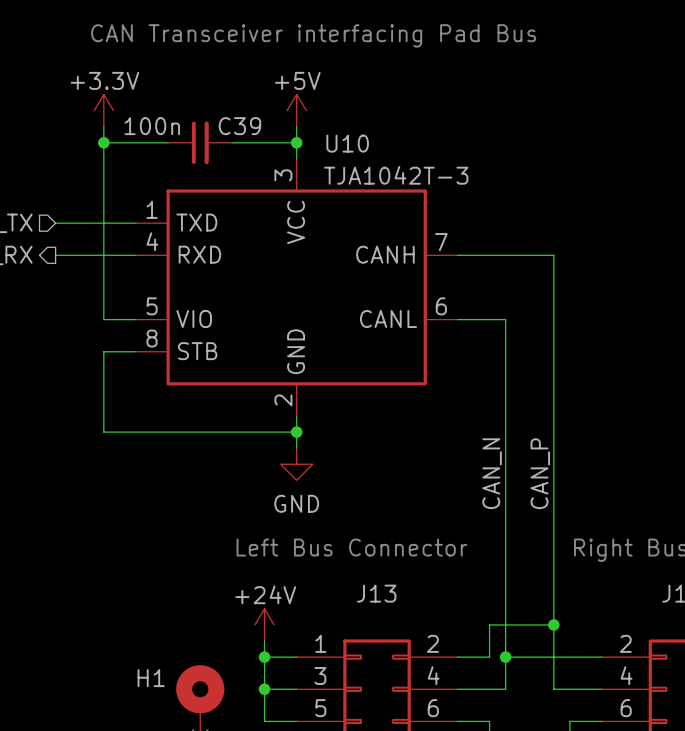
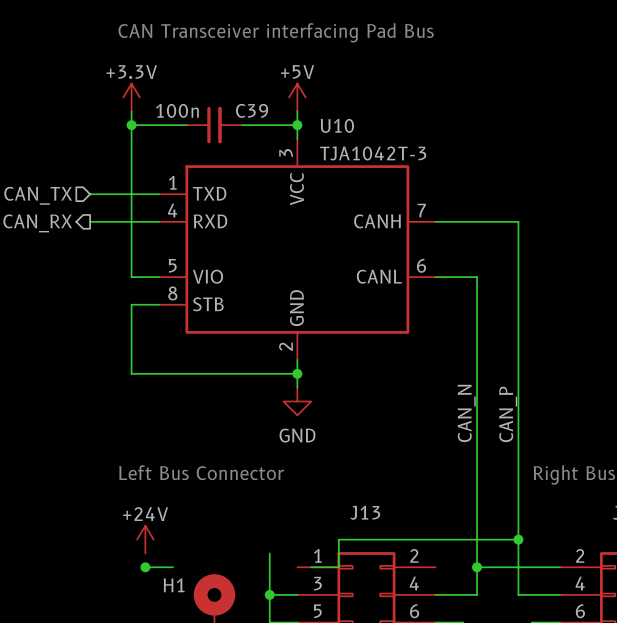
text position: Left Bus Connector (351, 547) -> Left Bus Connector (201, 472)
power symbol position: +24V (264, 624) -> +24V (145, 539)
wire: (489, 624) (489, 657) (457, 657) -> (463, 539) (338, 539) (338, 567) (311, 567)
junction: none -> (145, 567)
wire: (264, 657) (296, 657) -> (145, 567) (173, 567)
junction: (264, 657) -> none

